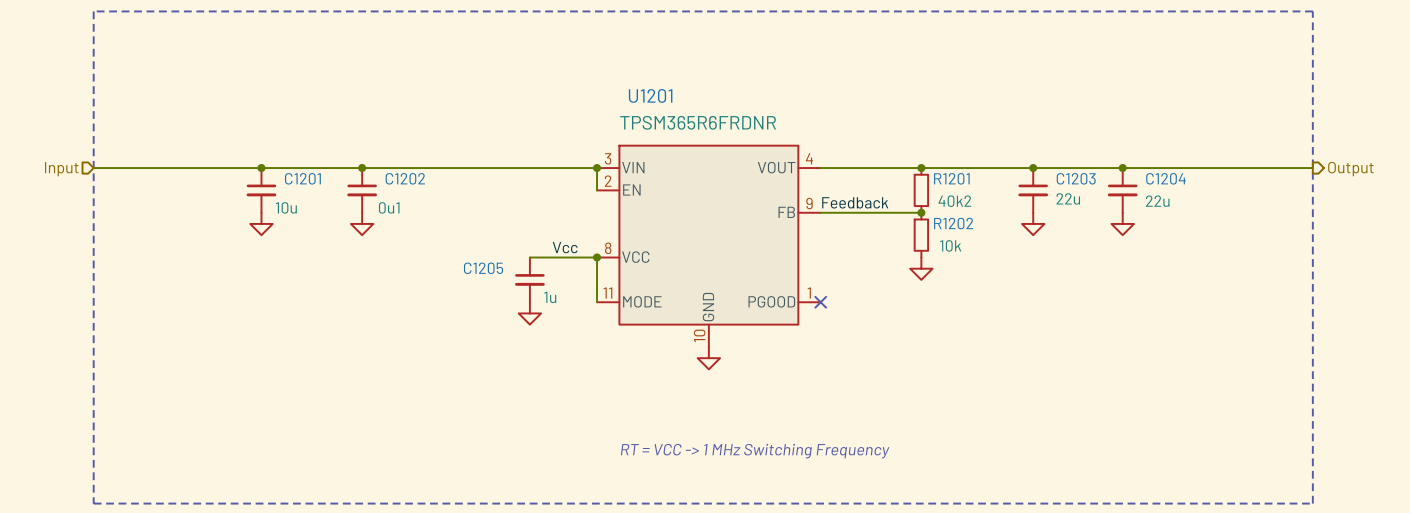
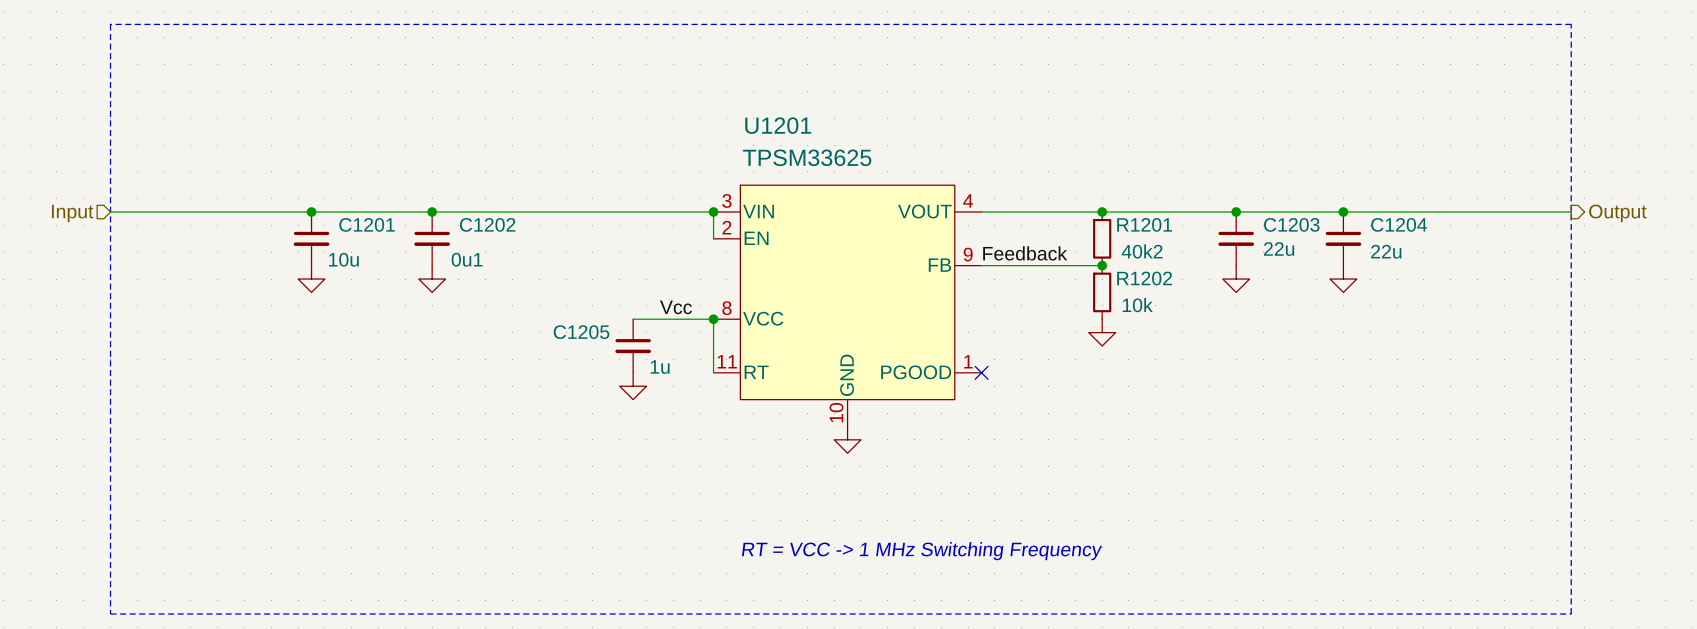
U1201 value: TPSM365R6FRDNR (698, 122) -> TPSM33625 (807, 157)
U1201 pin name: MODE (642, 301) -> RT (756, 372)

